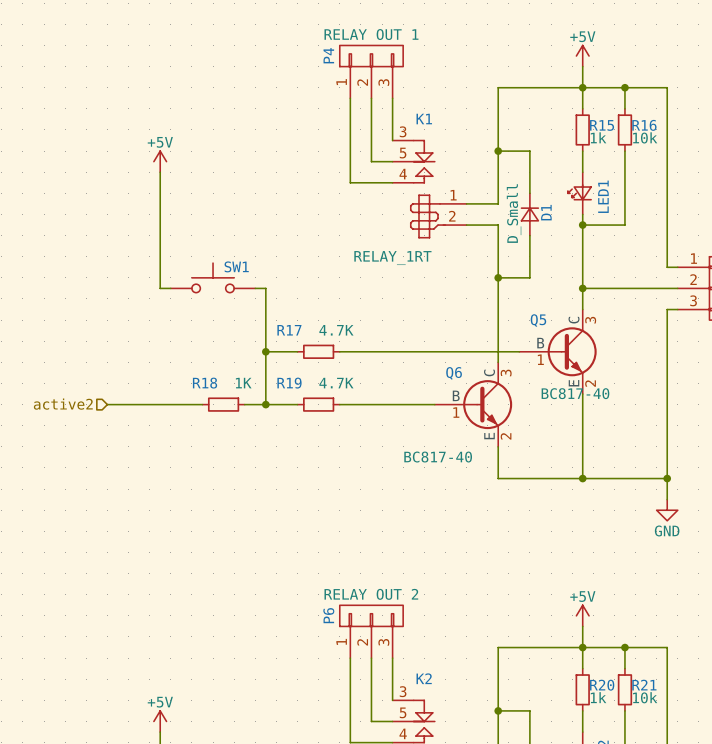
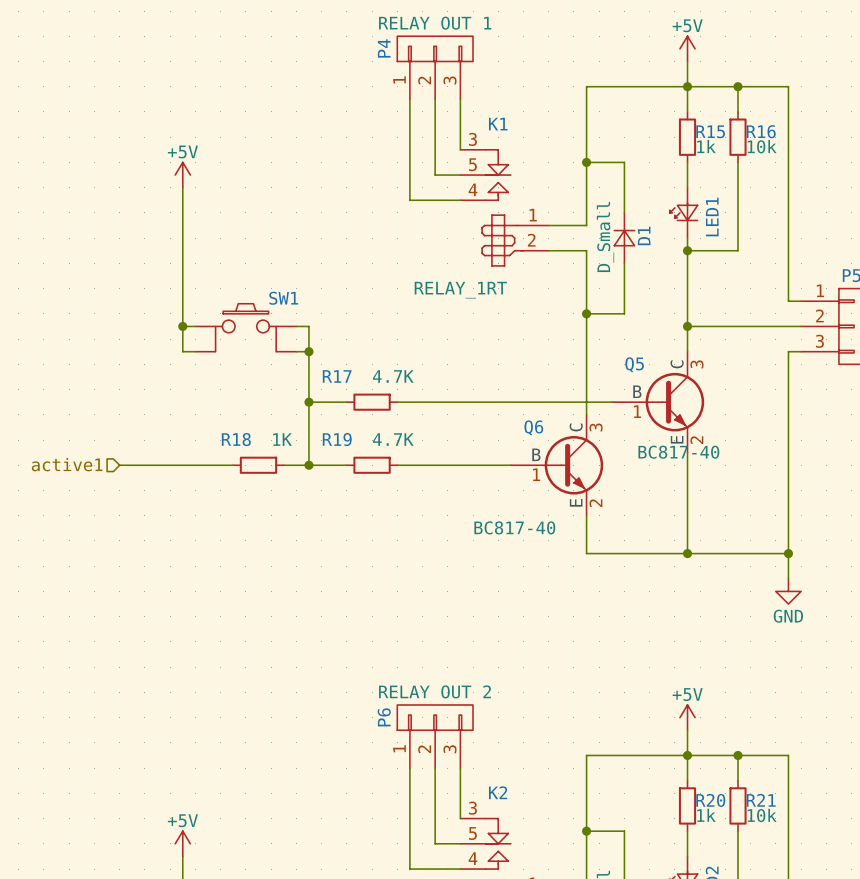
SW1 symbol: [170, 263, 256, 293] -> [195, 303, 297, 352]
wire: none -> (182, 326) (182, 351) (195, 351)
junction: none -> (182, 326)
wire: none -> (296, 351) (308, 351)
junction: none -> (308, 351)
hierarchical label: active2 (63, 404) -> active1 (67, 464)

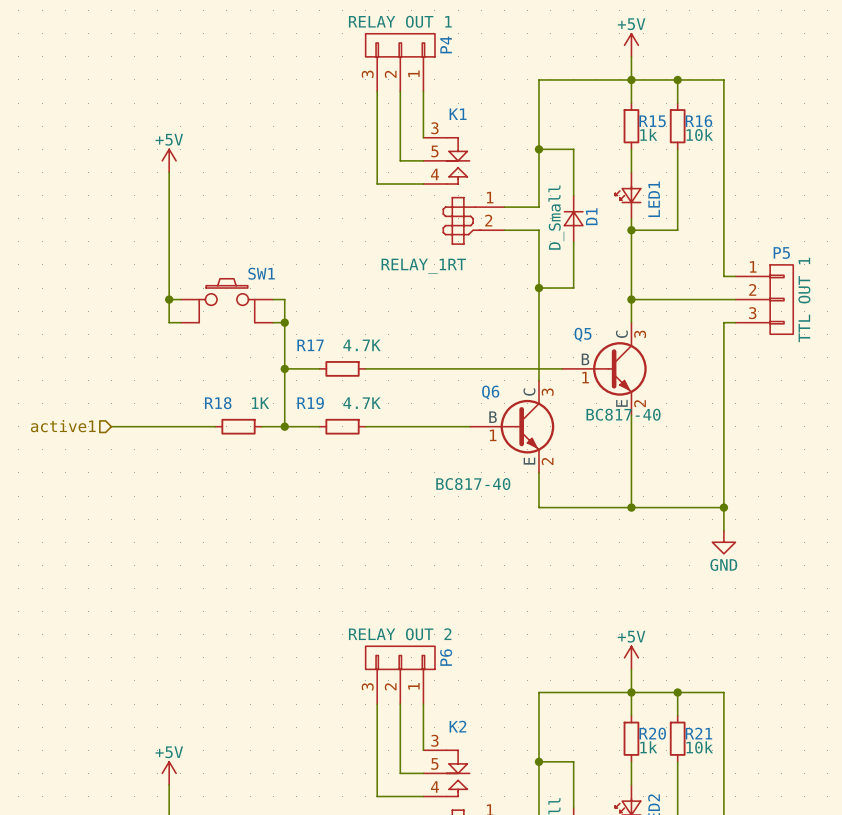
P4 flip: as is (435, 48) -> left-right (400, 45)
P6 flip: as is (435, 717) -> left-right (400, 657)

